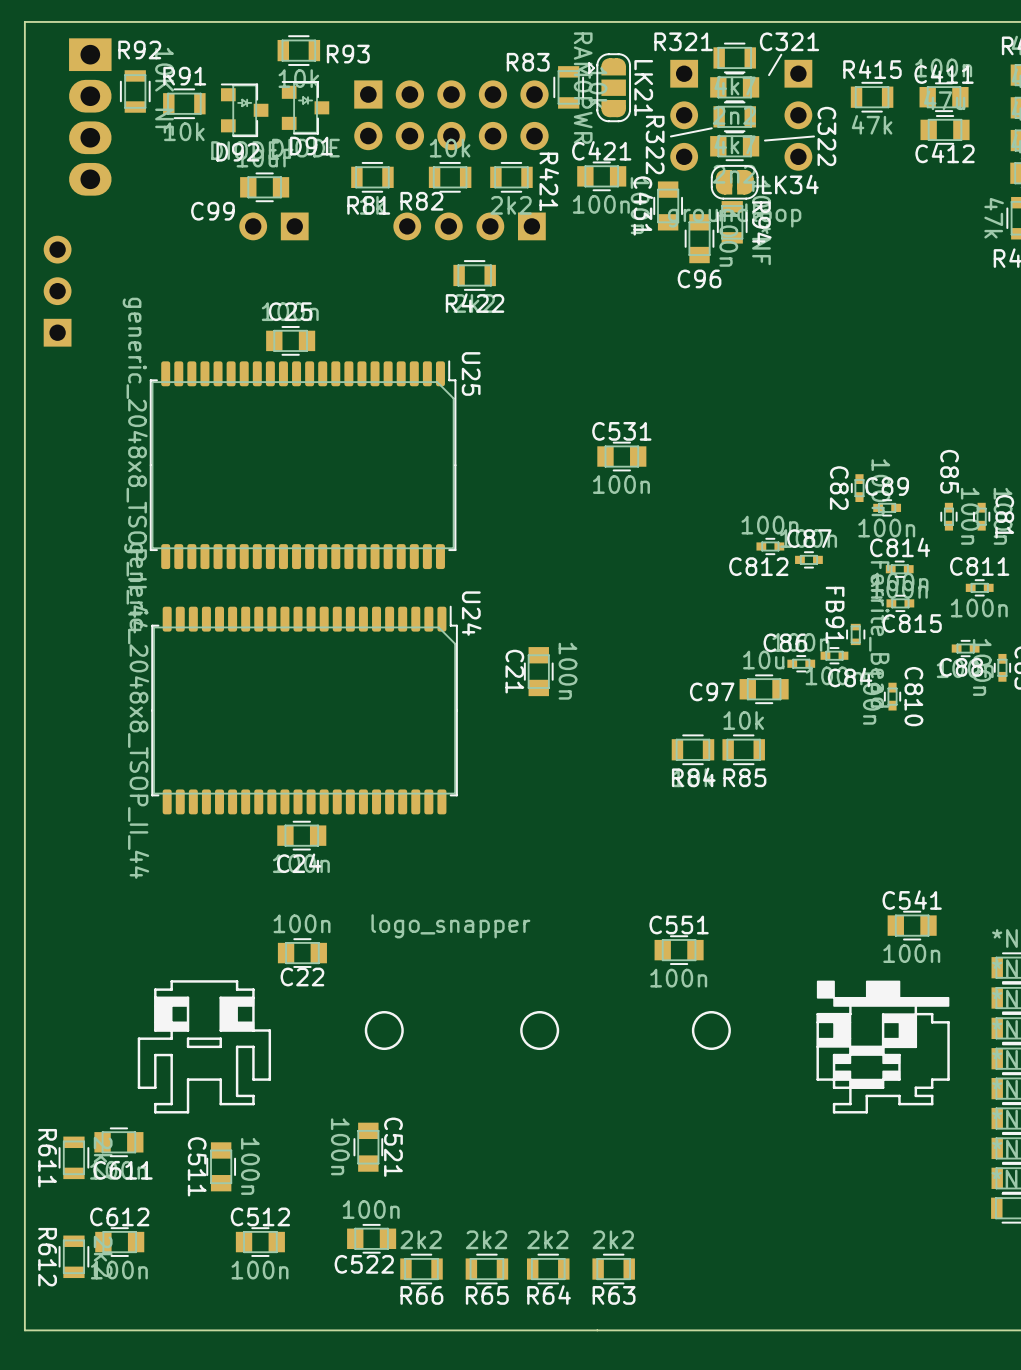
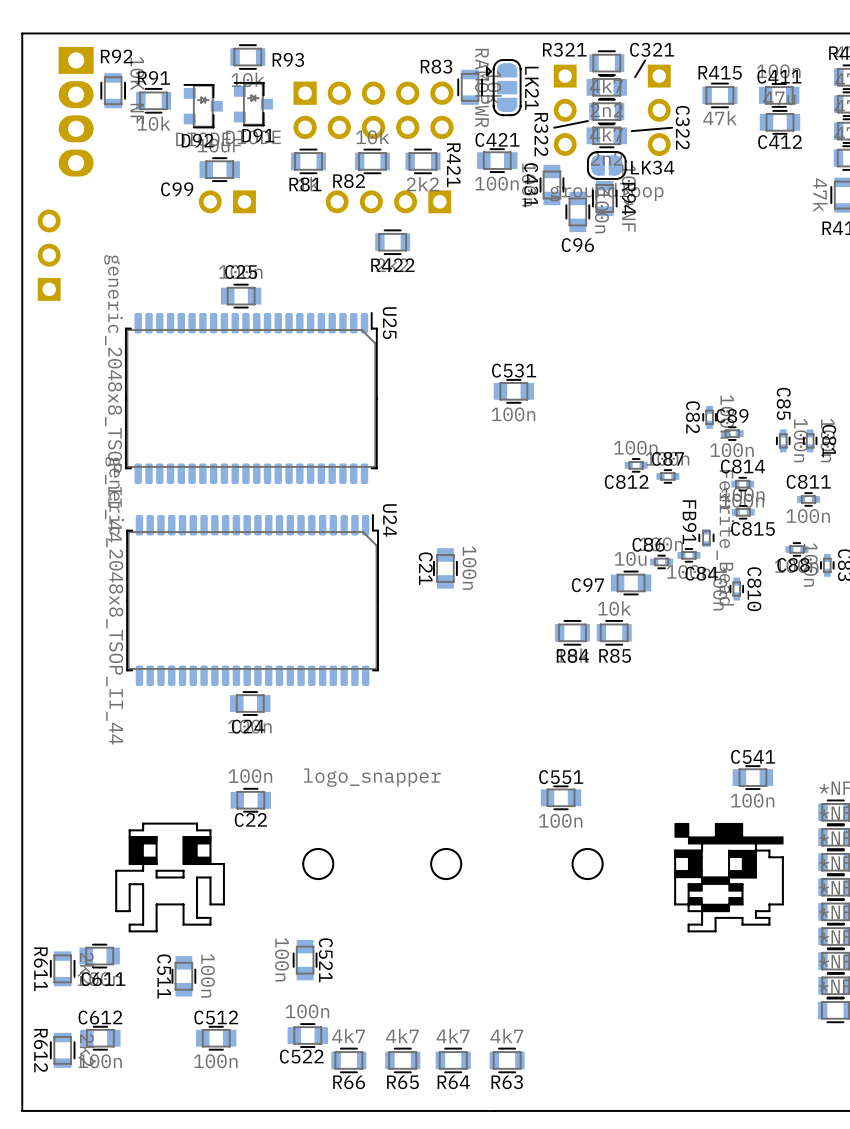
R66 value: 2k2 (421, 1239) -> 4k7 (348, 1035)
R65 value: 2k2 (486, 1239) -> 4k7 (402, 1035)
R64 value: 2k2 (547, 1239) -> 4k7 (452, 1035)
R63 value: 2k2 (613, 1239) -> 4k7 (506, 1035)

